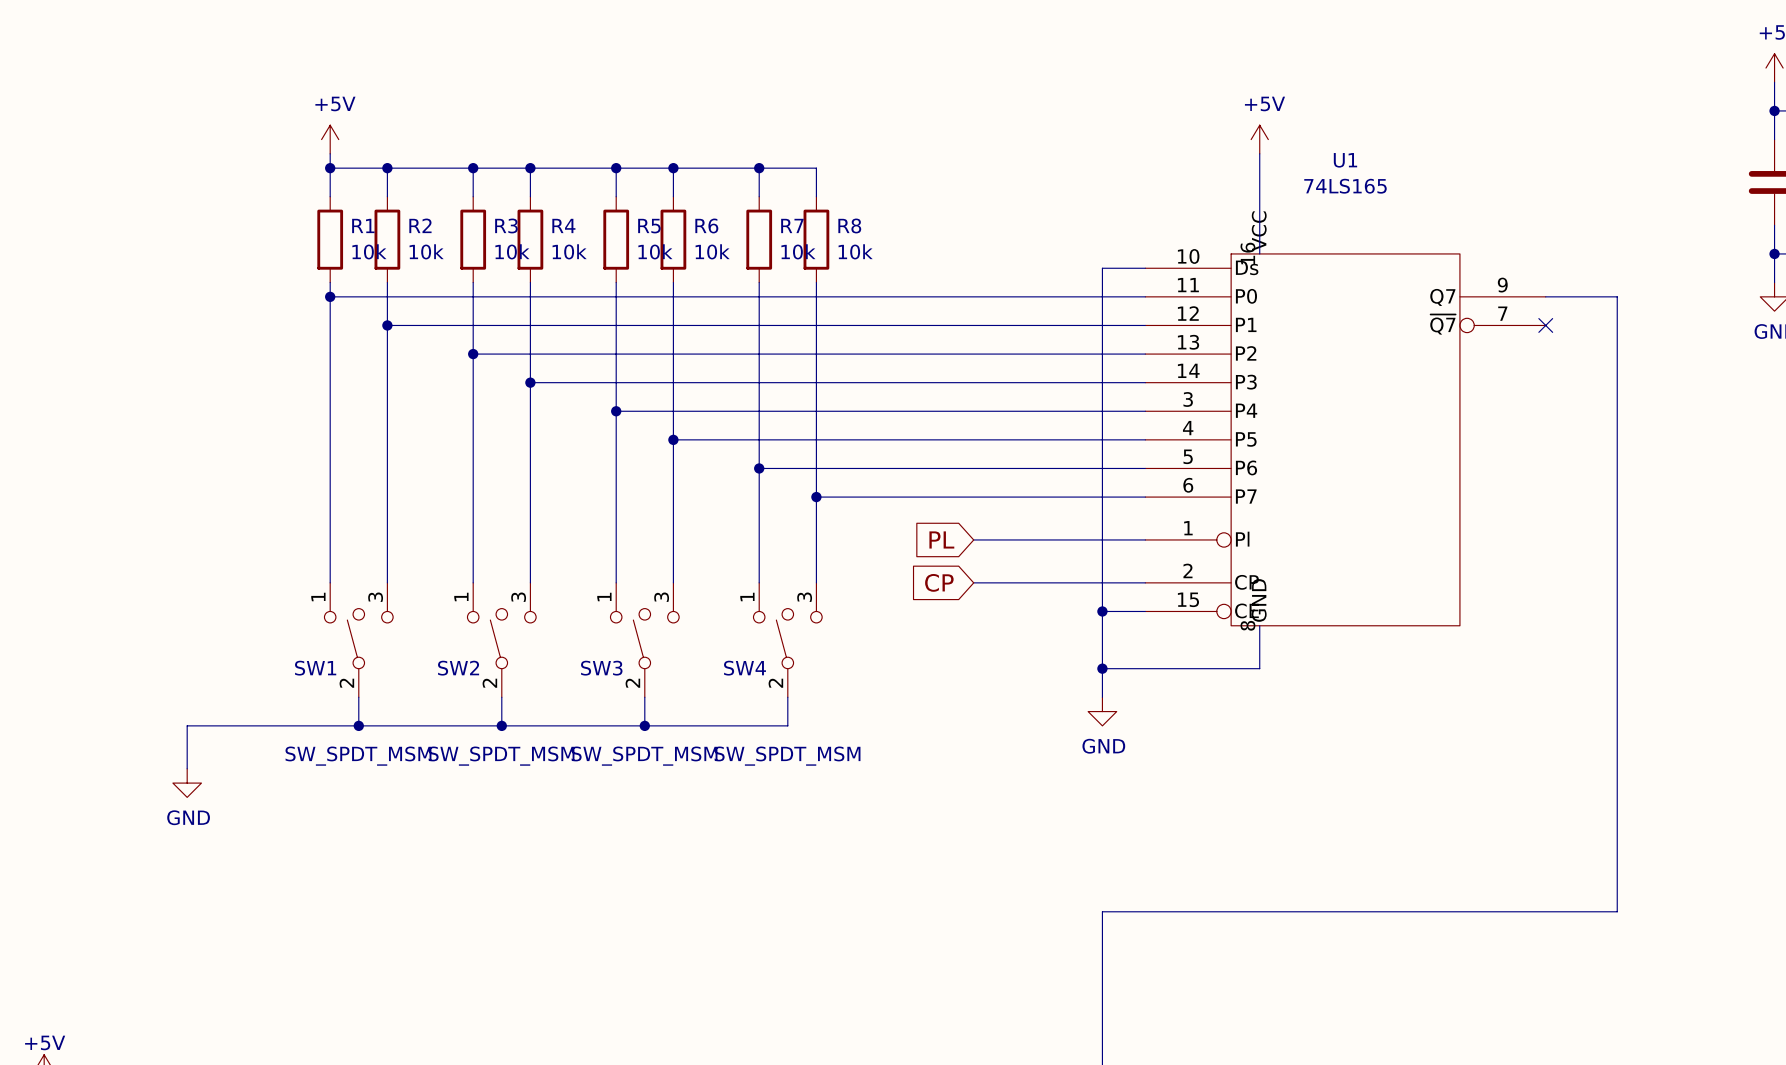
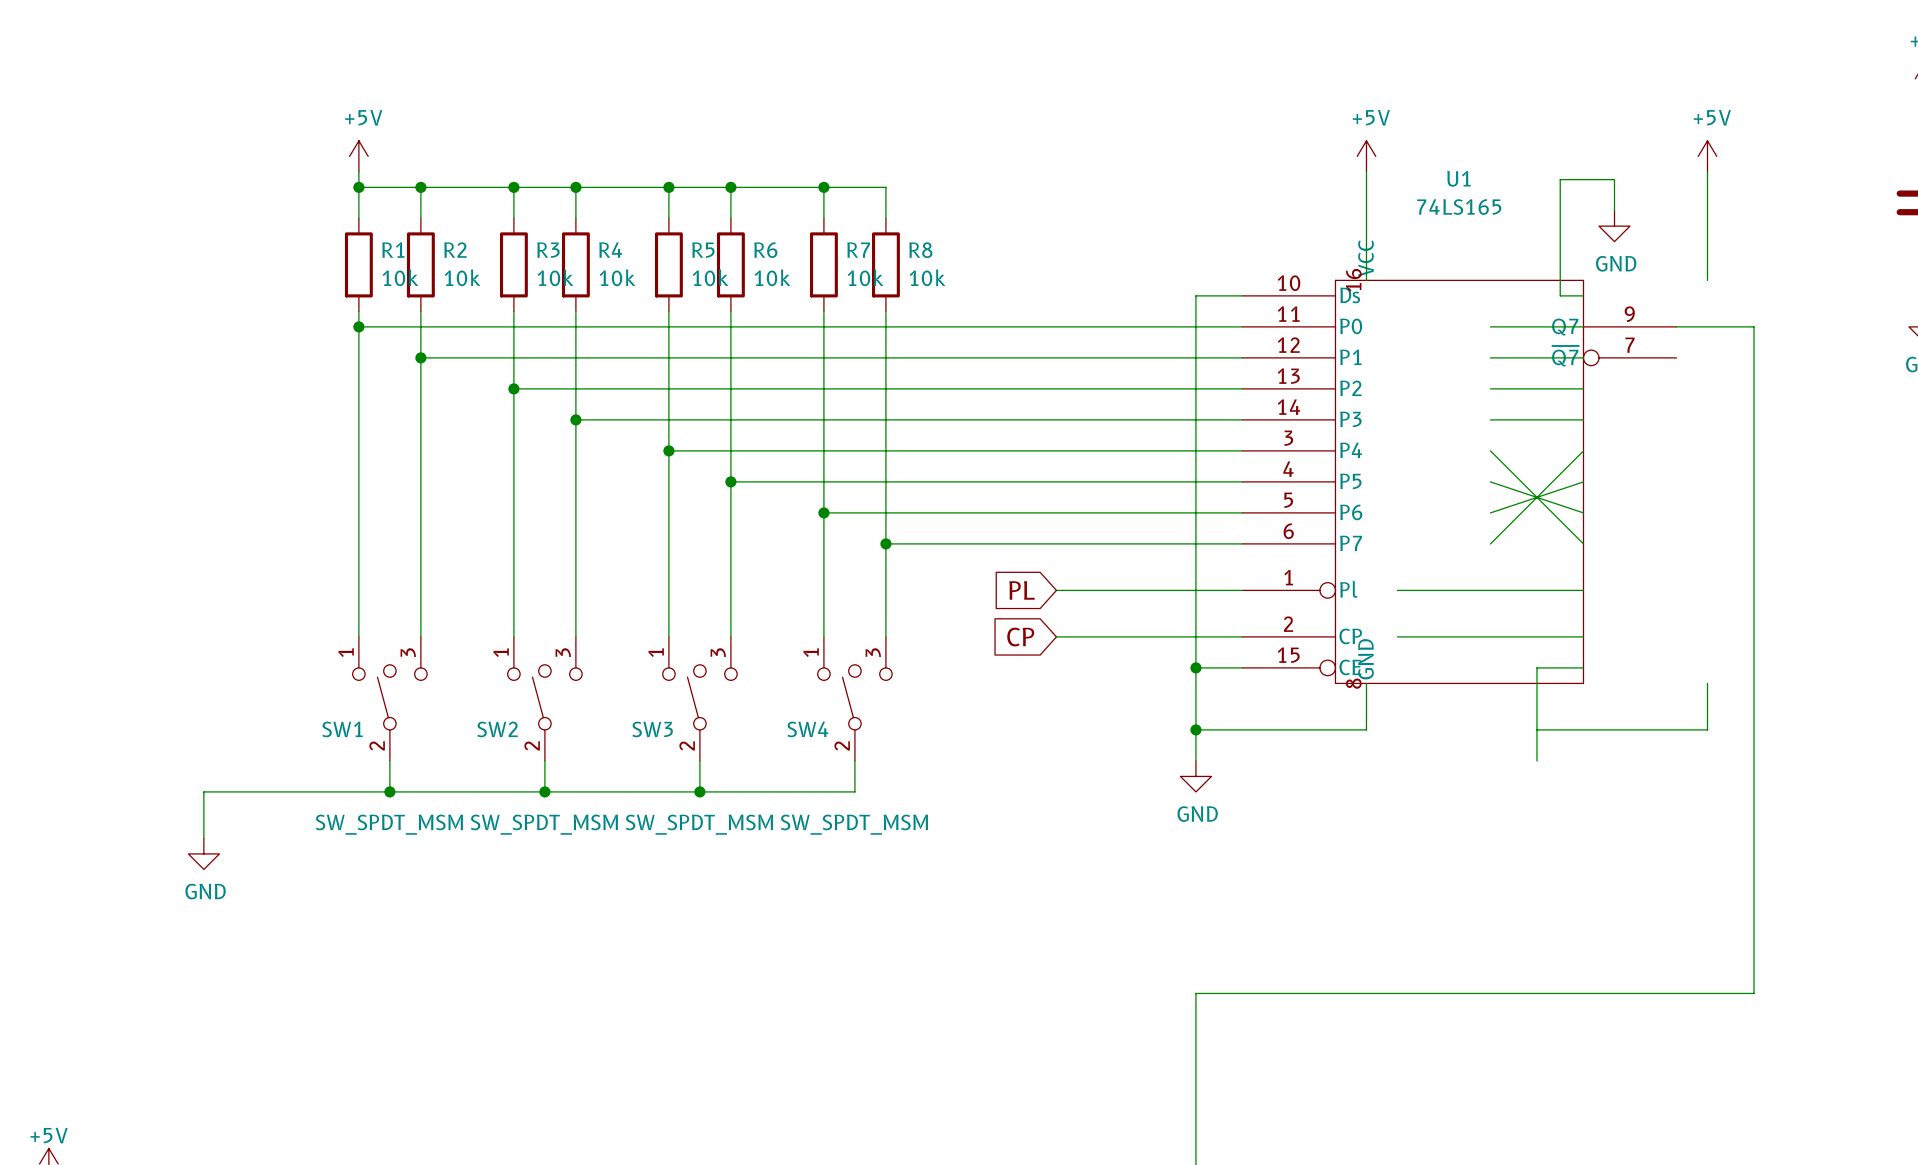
power symbol: none -> +5V (1707, 156)
wire: none -> (1707, 171) (1707, 280)
wire: none -> (1614, 210) (1614, 179) (1560, 179) (1560, 295) (1583, 295)
power symbol: none -> GND (1614, 226)
wire: none -> (1490, 326) (1583, 326)
wire: none -> (1490, 357) (1583, 357)
no-connect mark: (1545, 325) -> none
wire: none -> (1490, 388) (1583, 388)
wire: none -> (1490, 419) (1583, 419)
wire: none -> (1490, 450) (1583, 543)
wire: none -> (1583, 450) (1490, 543)
wire: none -> (1490, 481) (1583, 512)
wire: none -> (1583, 481) (1490, 512)
wire: none -> (1397, 590) (1583, 590)
wire: none -> (1397, 636) (1583, 636)
wire: none -> (1583, 667) (1536, 667) (1536, 760)
wire: none -> (1707, 683) (1707, 729) (1536, 729)

